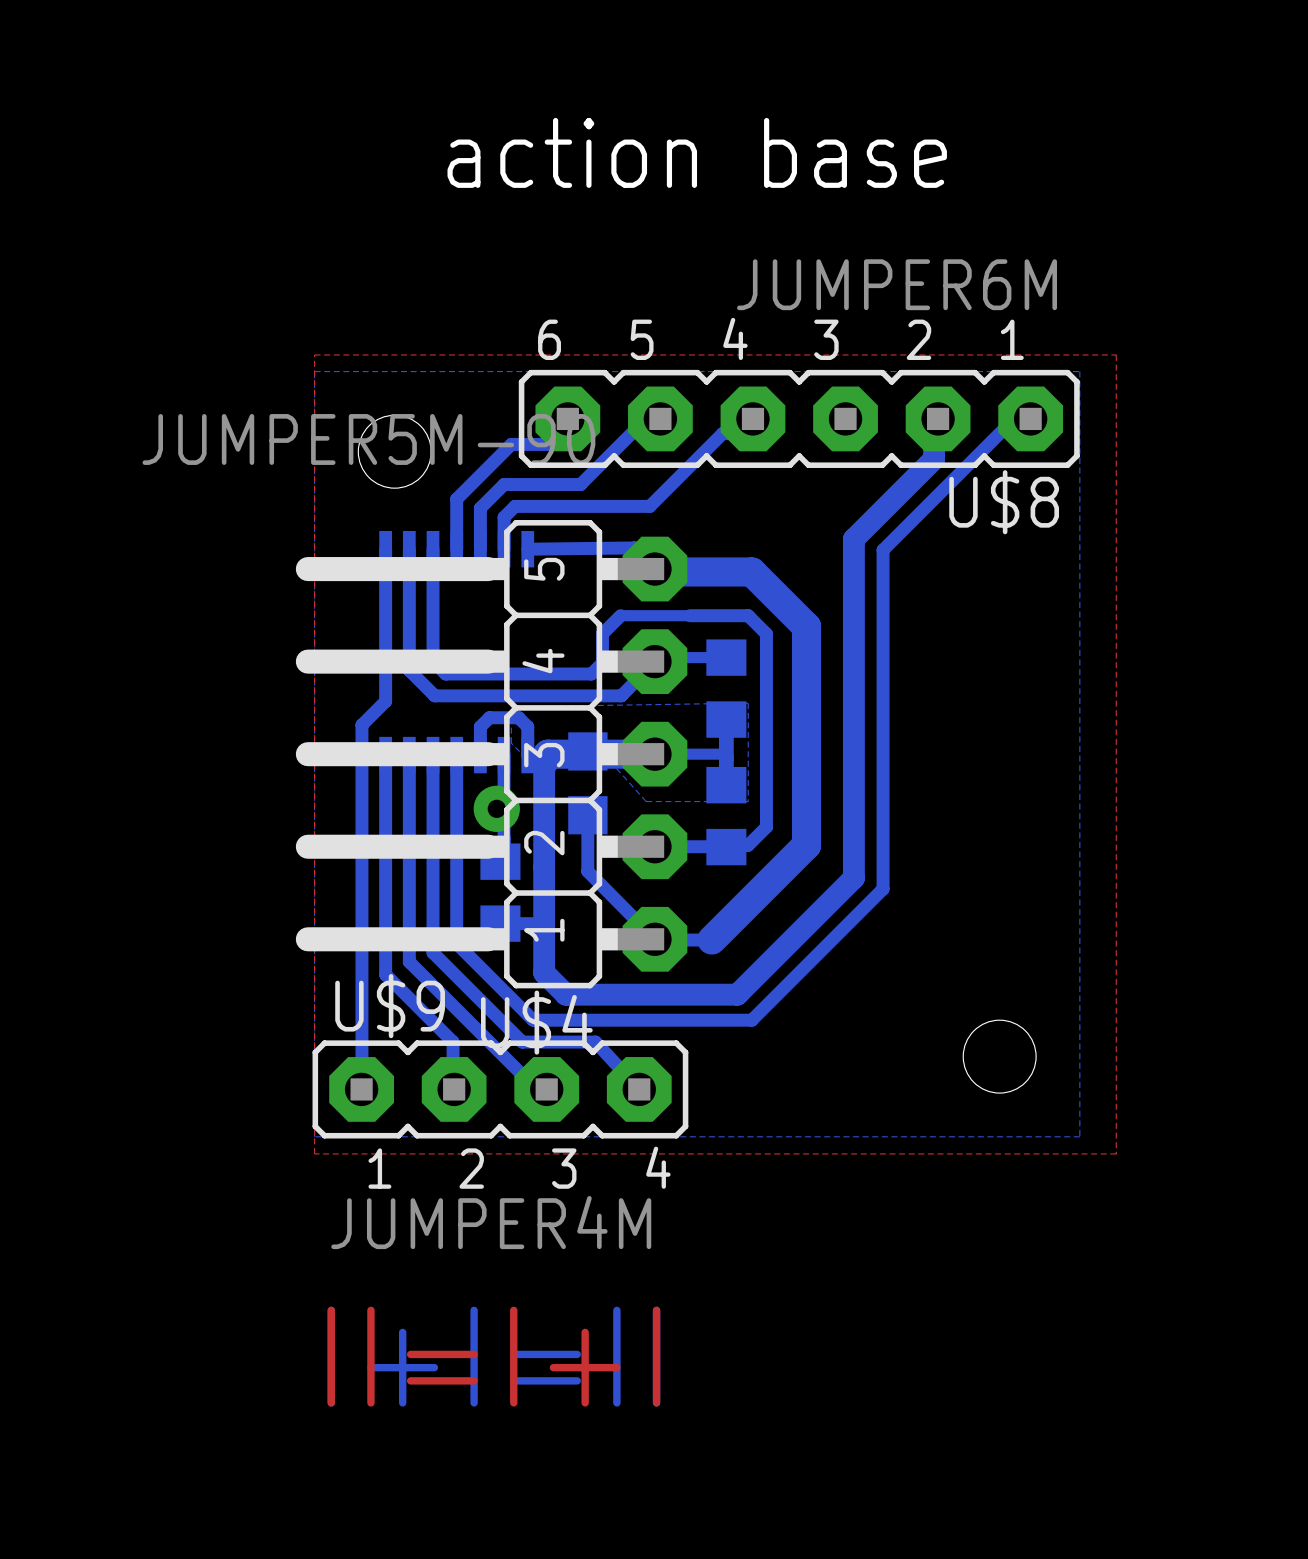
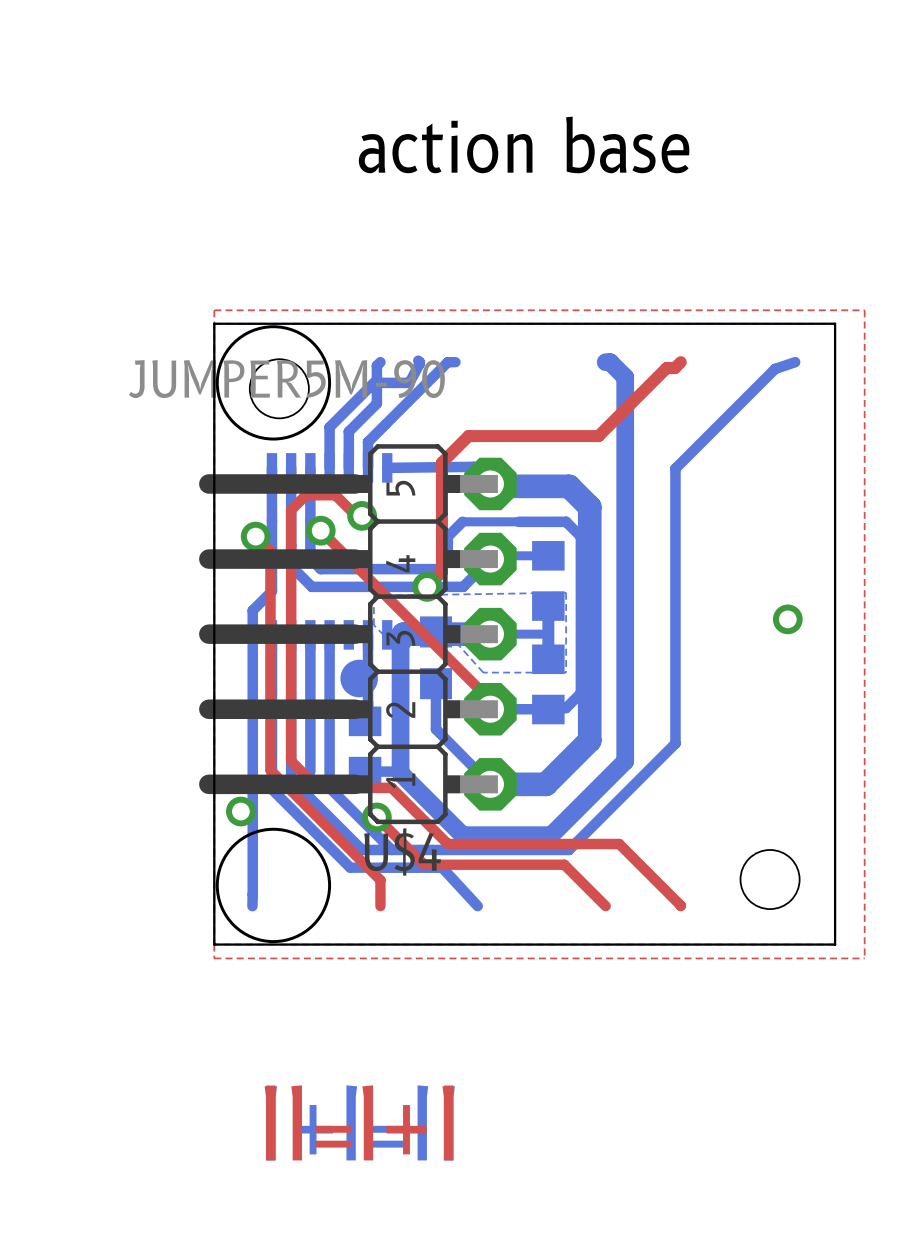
board edge: none -> (214, 323) (214, 944) (835, 944) (835, 323) (214, 323)
round board edge: none -> [215, 325, 332, 441]
bottom track: (752, 418) (738, 433) (722, 433) (649, 506) (515, 506) -> (455, 362) (447, 362) (376, 433)
U$8: JUMPER6M (799, 418) -> none
top track: none -> (680, 362) (674, 368) (666, 368) (598, 436) (468, 436) (441, 462) (441, 572) (427, 586)
bottom track: (938, 418) (934, 422) (934, 459) (853, 539) (853, 878) (821, 910) -> (605, 362) (610, 362) (625, 377) (625, 761)
bottom track: (649, 419) (660, 418) (642, 422) (580, 484) (504, 484) (480, 508) -> (380, 362) (376, 365) (376, 403) (348, 431) (348, 434)
bottom track: (777, 597) (806, 626) (806, 845) (711, 940) (657, 940) -> (589, 507) (589, 740) (545, 784) (490, 784)
top track: none -> (362, 515) (356, 515) (335, 495) (305, 495) (291, 509) (291, 761) (317, 787) (391, 787) (447, 844) (619, 844) (680, 905)
via: none -> (362, 515)
top track: none -> (320, 530) (490, 700) (490, 709)
via: none -> (320, 530)
top track: none -> (255, 536) (270, 551) (270, 770) (380, 880) (380, 906)
via: none -> (255, 536)
via: none -> (427, 586)
via: none -> (787, 619)
bottom track: (480, 755) (480, 726) (489, 717) (518, 717) (527, 726) (527, 755) -> none
part: none -> (359, 678)
via: (496, 808) -> none
bottom track: (433, 923) (433, 952) (522, 1042) -> (271, 789) (350, 867) (382, 867)
bottom track: (544, 925) (544, 972) (566, 994) (737, 994) -> (400, 773) (462, 835) (551, 835) (557, 829)
bottom track: (409, 932) (409, 961) (536, 1089) (546, 1089) -> (291, 779) (362, 849) (391, 849)
bottom track: (385, 945) (385, 974) (453, 1042) (454, 1089) -> none
via: none -> (240, 811)
top track: none -> (376, 817) (424, 864) (564, 864) (605, 906)
via: none -> (376, 817)
round board edge: none -> [215, 827, 332, 944]
U$9: JUMPER4M (500, 1089) -> none

